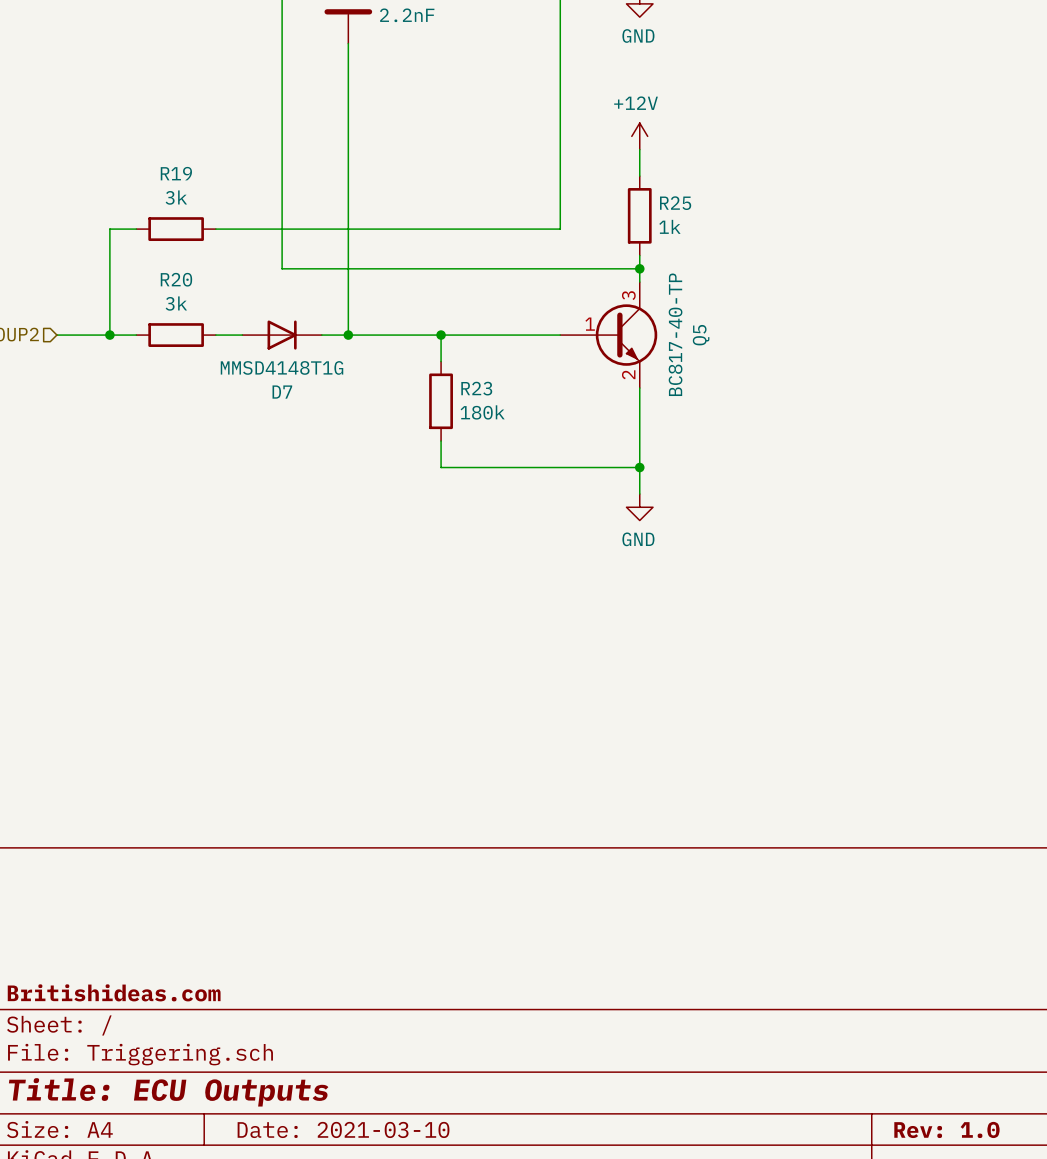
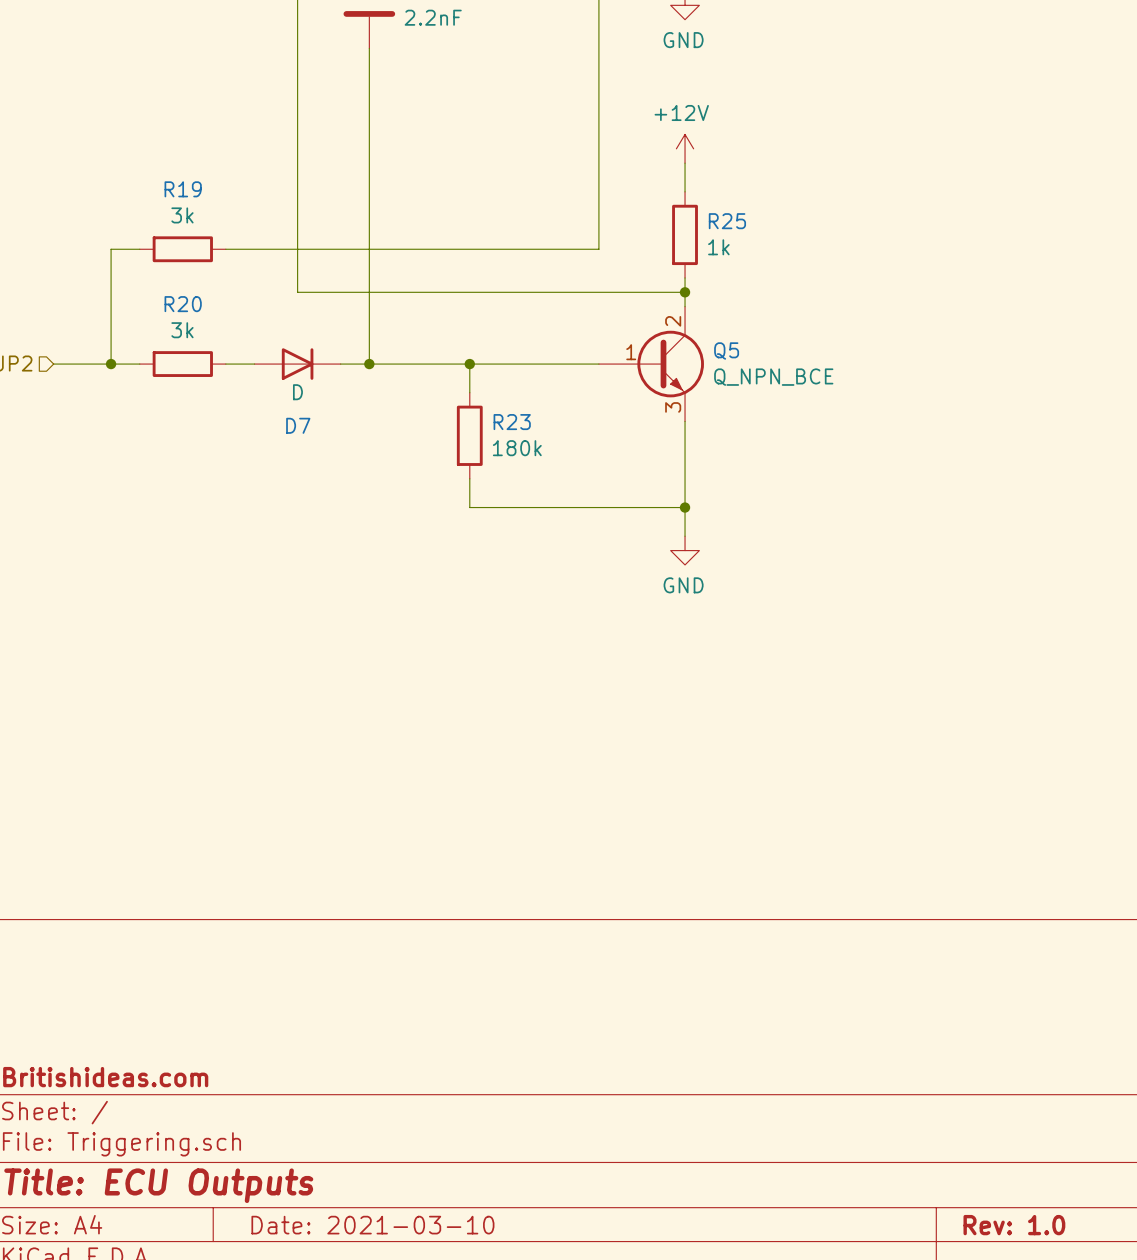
Q5 pin number: 3 (628, 295) -> 2 (673, 321)
Q5 value: BC817-40-TP (675, 334) -> Q_NPN_BCE (773, 377)
Q5 name rotation: 0° (701, 335) -> 90° clockwise (726, 351)
D7 value: MMSD4148T1G (282, 367) -> D (297, 392)
Q5 pin number: 2 (628, 374) -> 3 (673, 407)

